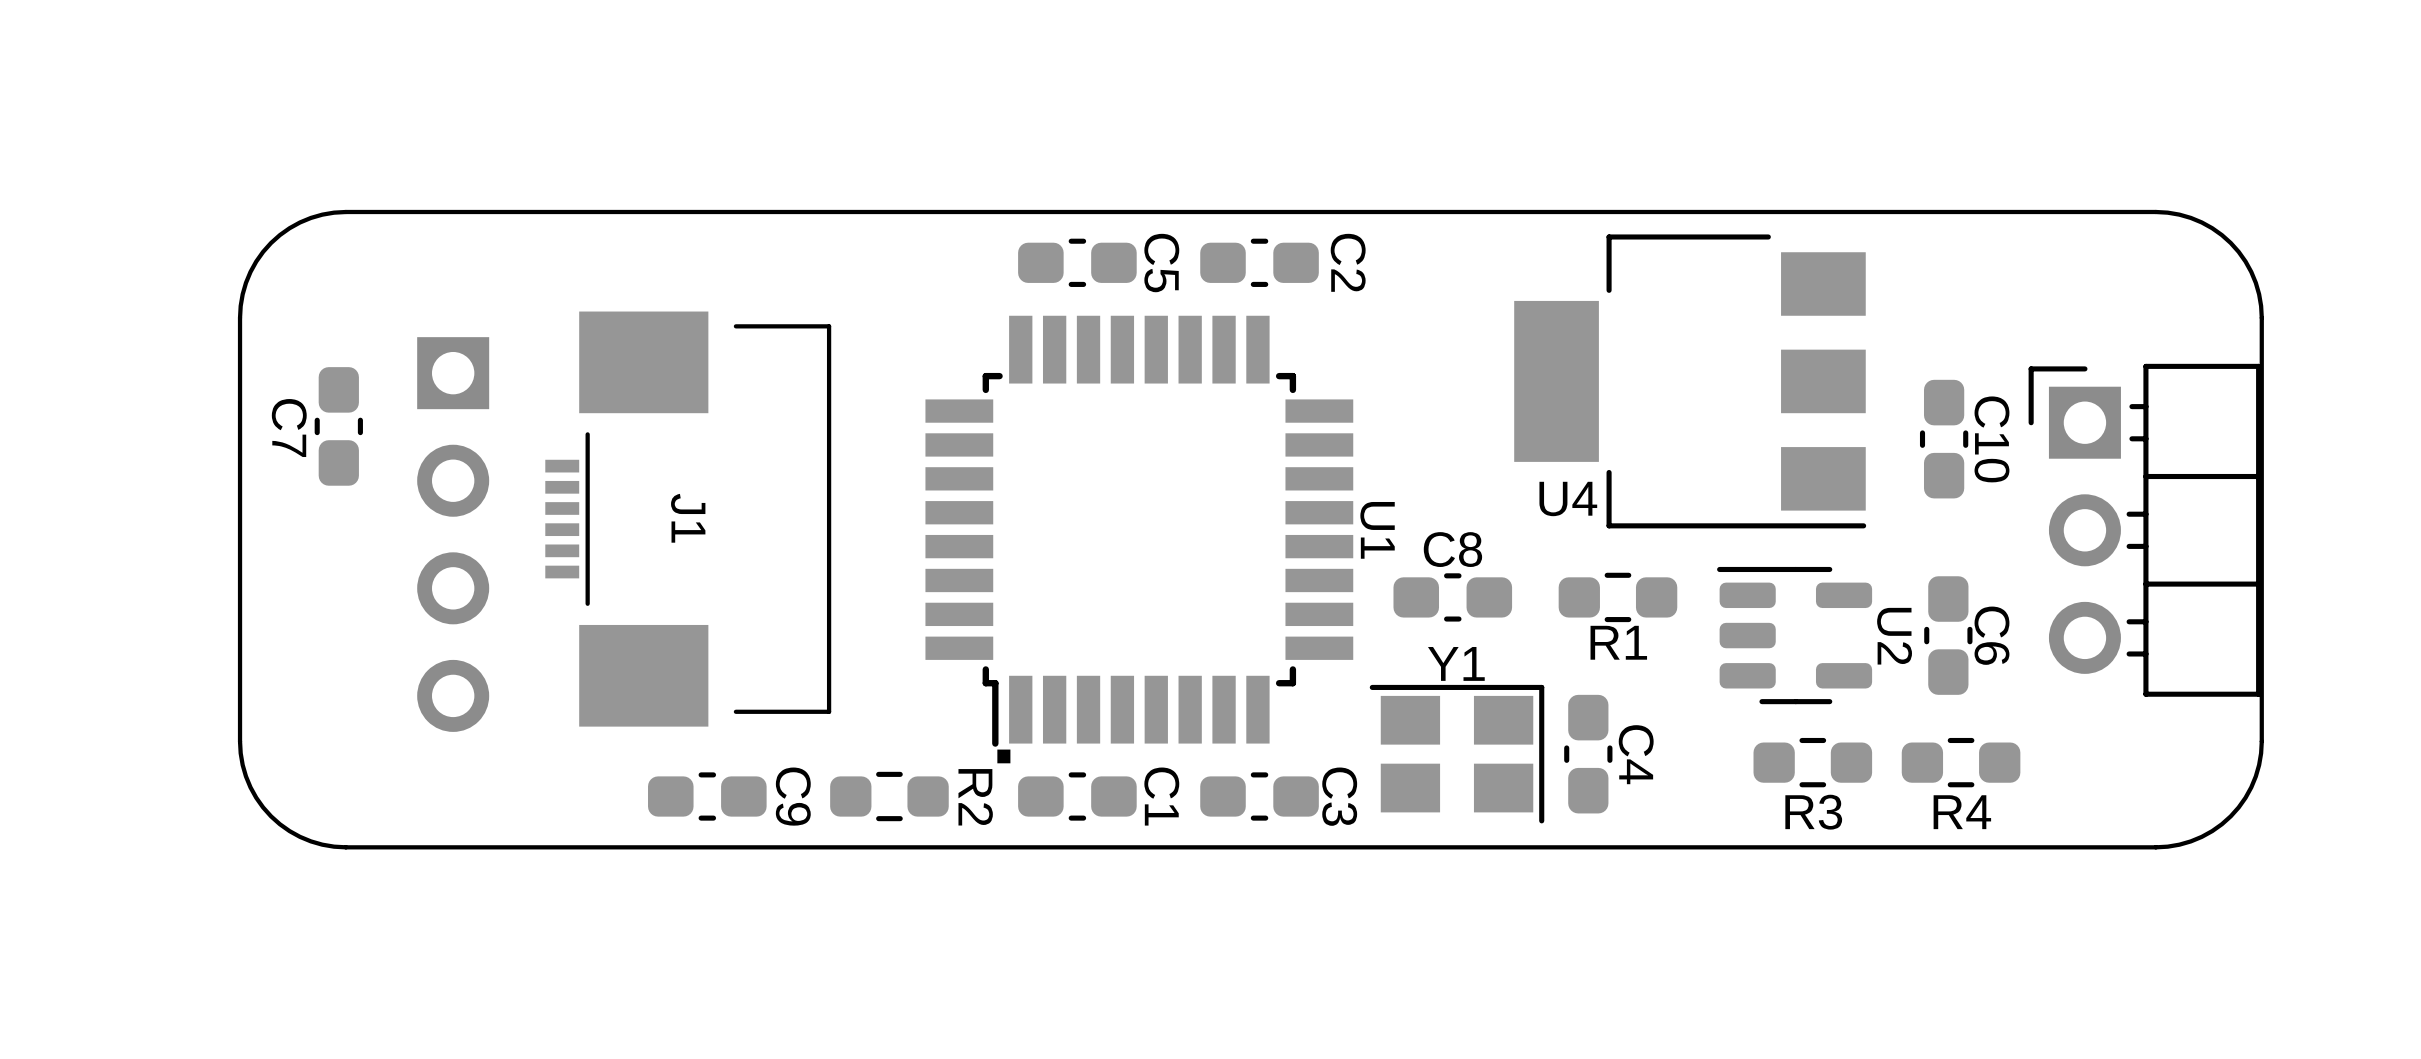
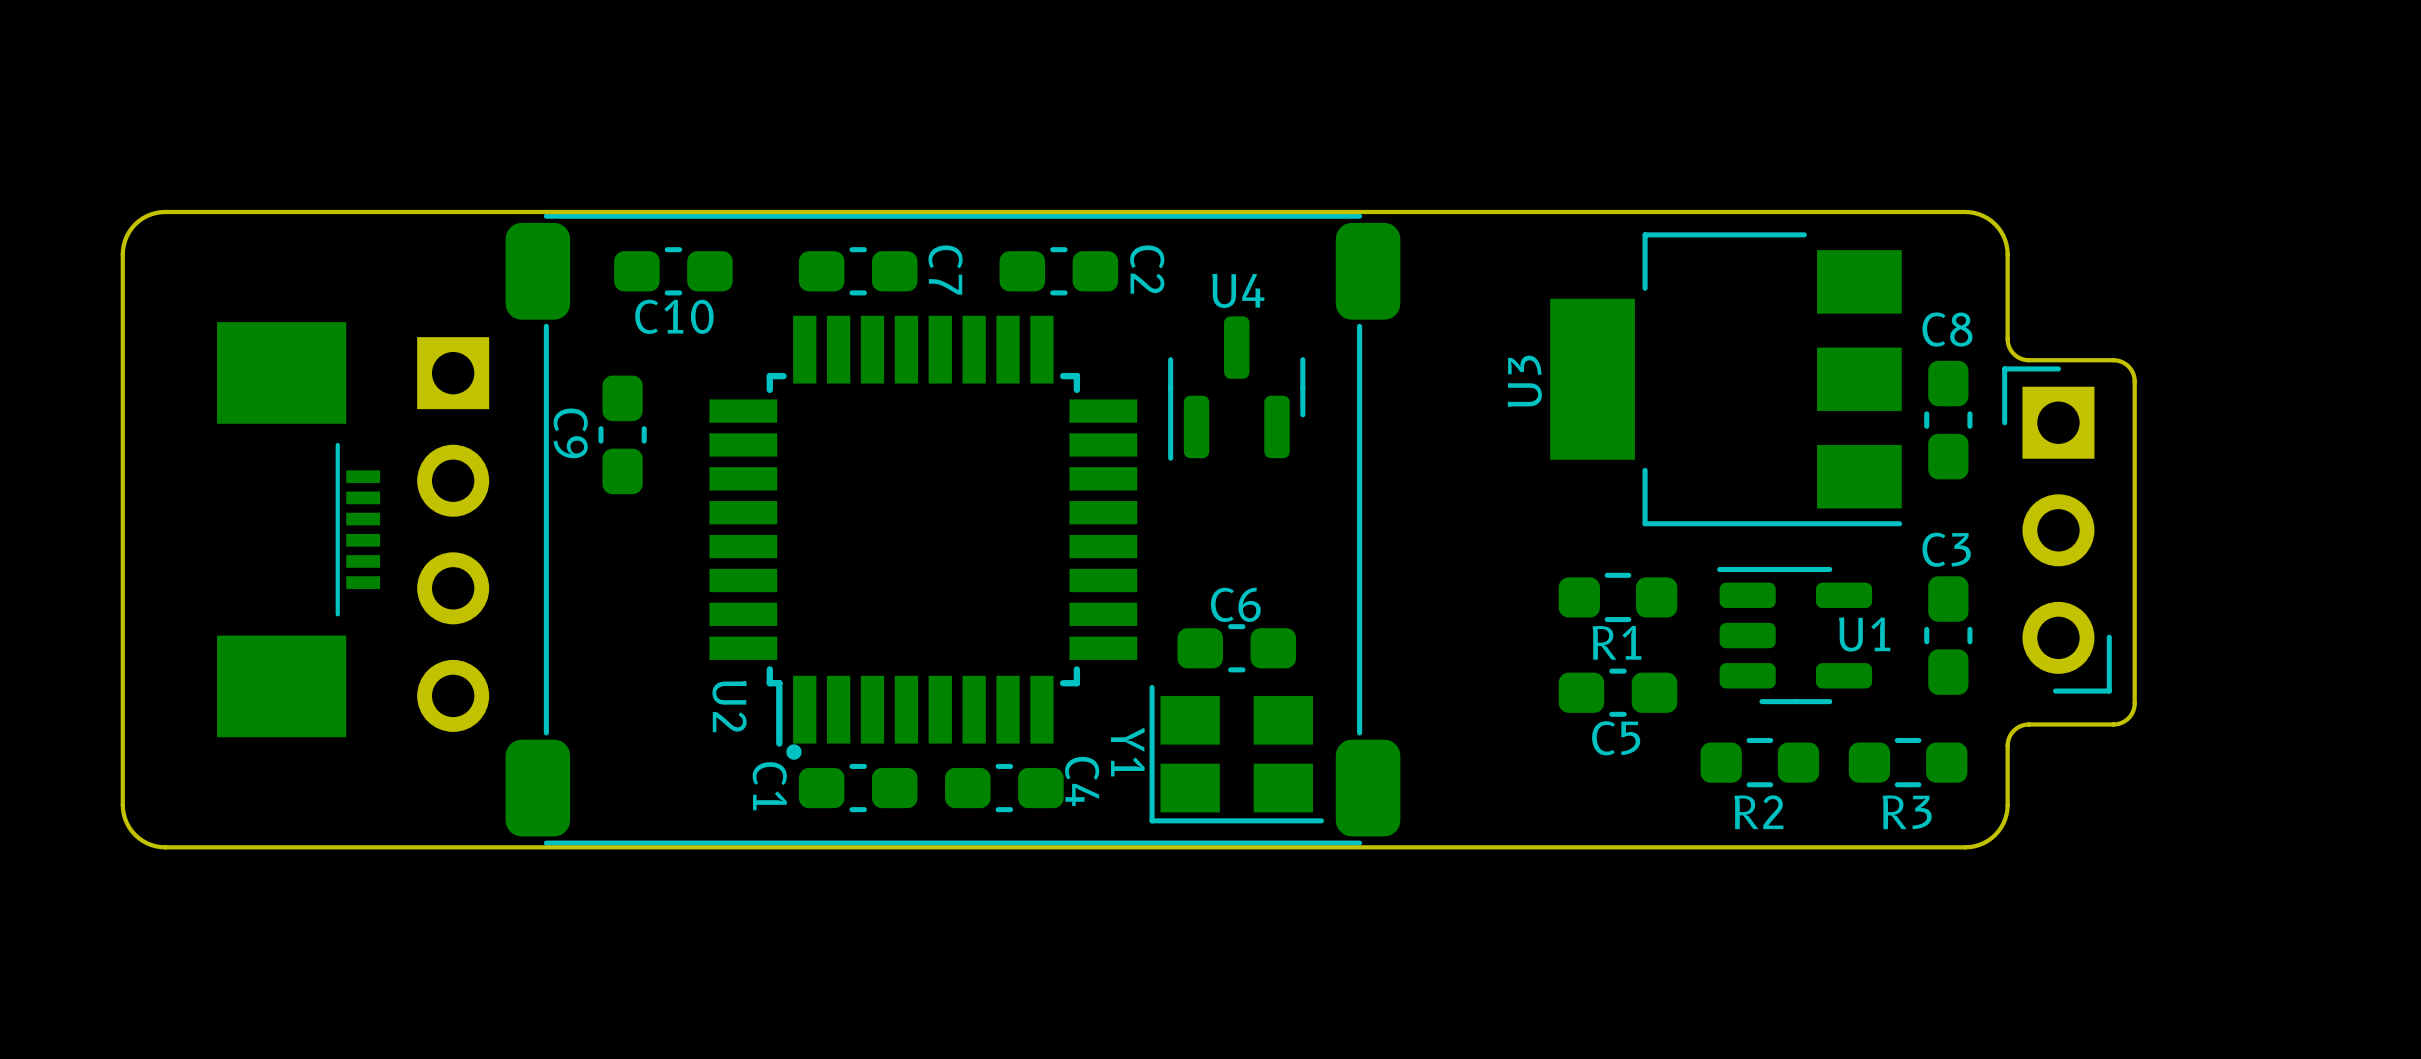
board edge: (345, 211) (322, 214) (299, 222) (271, 243) (256, 261) (245, 282) (240, 317) (240, 741) (242, 765) (256, 797) (279, 824) (310, 841) (345, 847) -> (345, 211) (155, 213) (142, 218) (132, 227) (125, 240) (122, 254) (122, 804) (125, 818) (132, 831) (138, 838) (151, 844) (160, 847) (345, 847)
board edge: (1965, 211) (2155, 211) (2190, 217) (2221, 235) (2238, 251) (2255, 282) (2261, 317) (2261, 741) (2255, 776) (2245, 797) (2230, 816) (2212, 831) (2179, 844) (2155, 847) (1965, 847) -> (1965, 211) (1974, 213) (1987, 218) (1998, 227) (2005, 240) (2007, 254) (2007, 341) (2013, 354) (2026, 360) (2119, 360) (2130, 368) (2134, 381) (2134, 703) (2133, 711) (2126, 720) (2116, 724) (2028, 724) (2015, 728) (2010, 735) (2007, 742) (2007, 804) (2003, 823) (1998, 831) (1987, 840) (1979, 844) (1965, 847)
U4 footprint: [1514, 234, 1867, 529] -> [1168, 316, 1306, 461]
C5 position: (1077, 262) -> (1617, 692)
C2 position: (1259, 262) -> (1058, 271)
C5 name rotation: 0° (1161, 263) -> 90° counterclockwise (1616, 738)
C5 name position: C5 (1161, 263) -> C5 (1616, 738)
U3: none -> (1726, 379)
C7 rotation: 0° (338, 426) -> 90° clockwise (858, 271)
C7 position: (338, 426) -> (858, 271)
C7 name position: C7 (289, 428) -> C7 (945, 270)
C10 rotation: 0° (1944, 439) -> 90° clockwise (673, 271)
C10 position: (1944, 439) -> (673, 271)
U4 name position: U4 (1568, 498) -> U4 (1238, 290)
J1: (688, 519) -> none
part: none -> (298, 529)
part: none -> (952, 529)
part: none -> (2056, 529)
part: (2144, 530) -> none
U2: none -> (923, 531)
U1: (1139, 531) -> none
C8 rotation: 0° (1452, 597) -> 90° clockwise (1948, 420)
C8 position: (1452, 597) -> (1948, 420)
C6 name: C6 (1991, 635) -> C3 (1946, 549)
U2 name: U2 (1894, 636) -> U1 (1864, 634)
C6: none -> (1236, 648)
Y1 name position: Y1 (1456, 663) -> Y1 (1127, 752)
Y1 rotation: 0° (1457, 754) -> 180° (1236, 754)
Y1 position: (1457, 754) -> (1236, 754)
C4 rotation: 0° (1588, 754) -> 90° clockwise (1004, 788)
C4 position: (1588, 754) -> (1004, 788)
text position: . (1003, 756) -> . (793, 752)
R3 position: (1812, 762) -> (1908, 762)
R4: (1961, 762) -> none
C9 rotation: 0° (707, 796) -> 90° clockwise (622, 434)
C9 position: (707, 796) -> (622, 434)
C9 name position: C9 (793, 796) -> C9 (570, 433)
R2 position: (889, 796) -> (1759, 762)
C1 position: (1077, 796) -> (858, 788)
C1 name position: C1 (1161, 796) -> C1 (769, 786)
C3: (1259, 796) -> none
R2 name rotation: 0° (975, 797) -> 90° counterclockwise (1758, 812)
R2 name position: R2 (975, 797) -> R2 (1758, 812)

